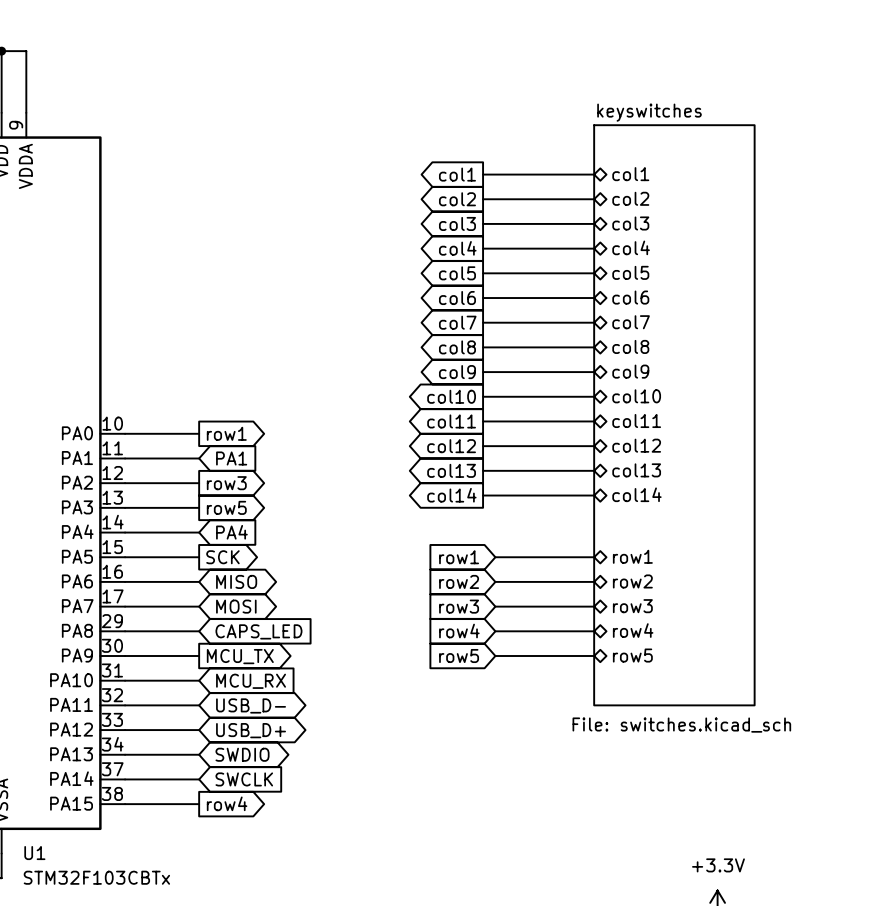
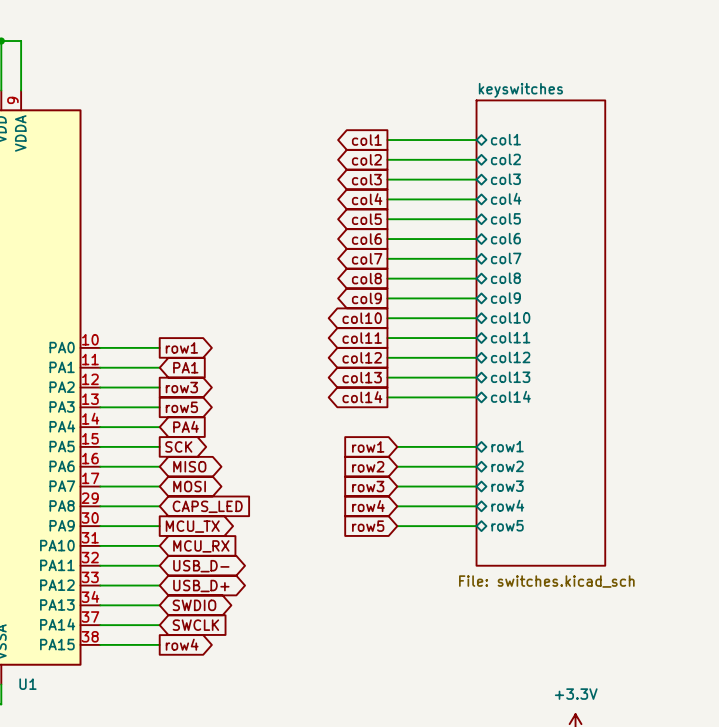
U1 value: STM32F103CBTx (96, 877) -> none

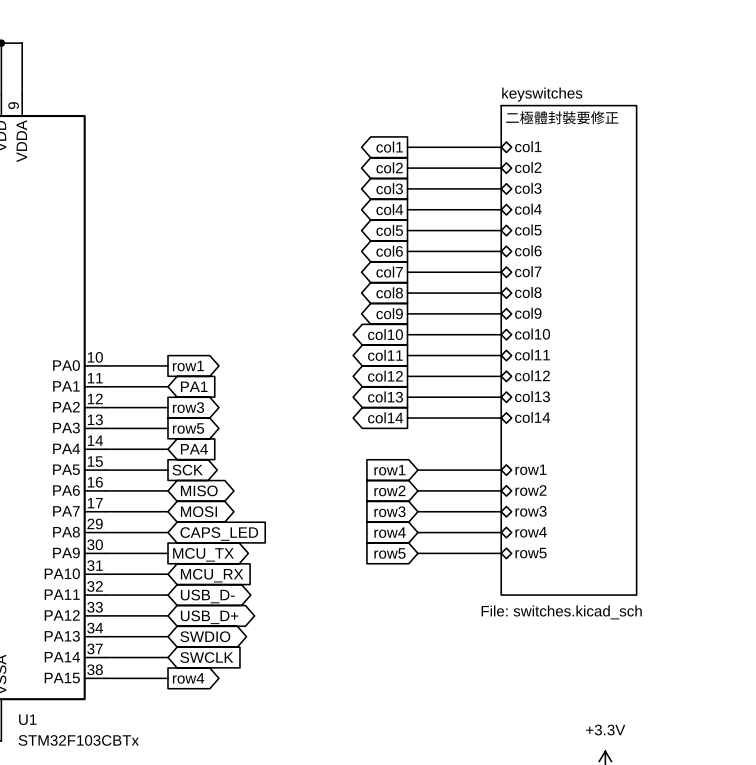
text: none -> 二極體封裝要修正 (562, 117)
U1 value: none -> STM32F103CBTx (78, 740)

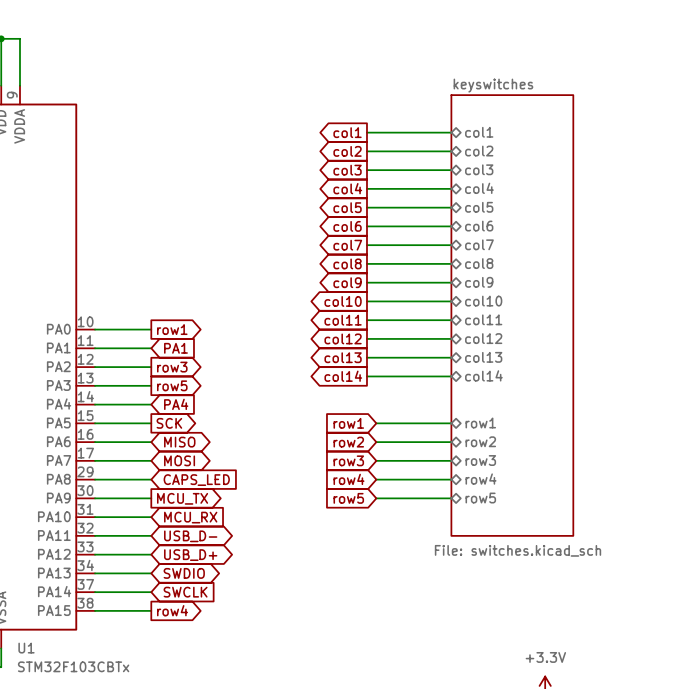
text: 二極體封裝要修正 (562, 117) -> none

